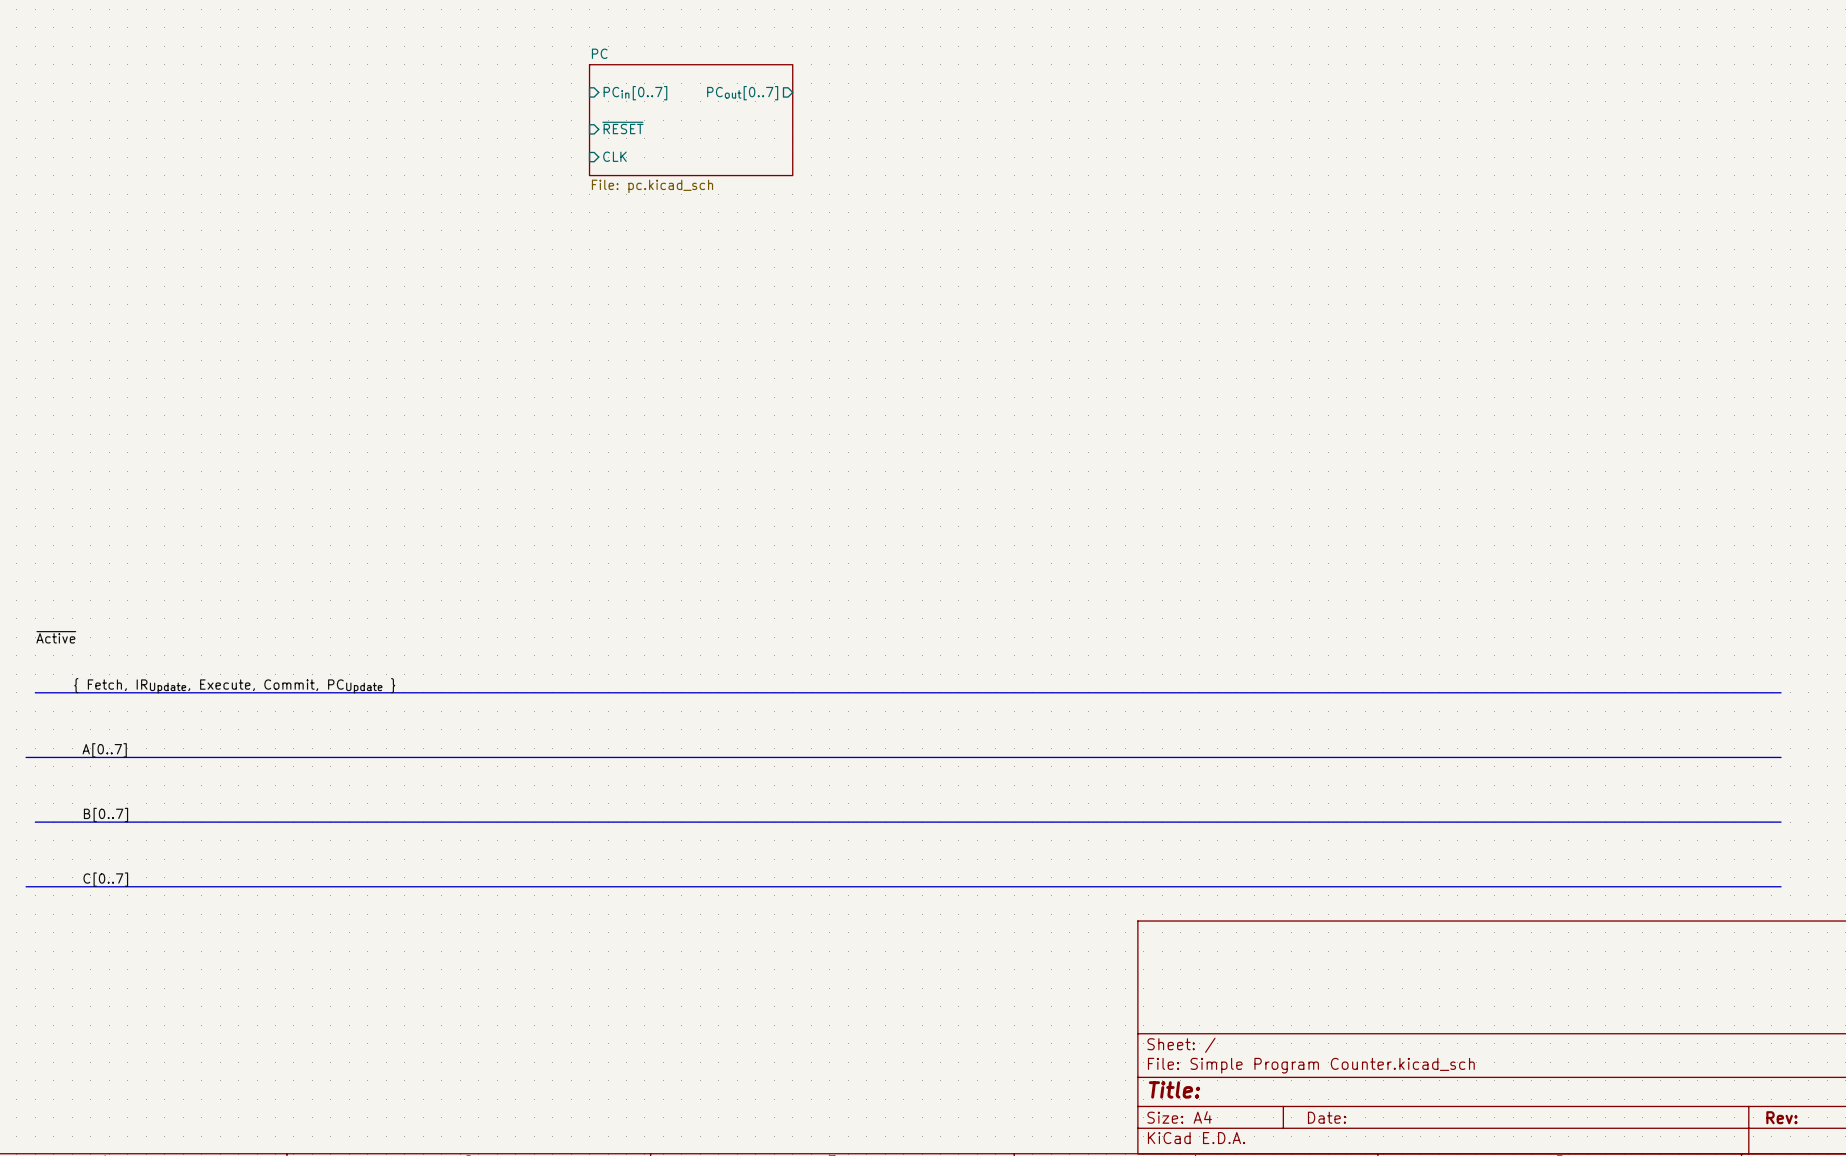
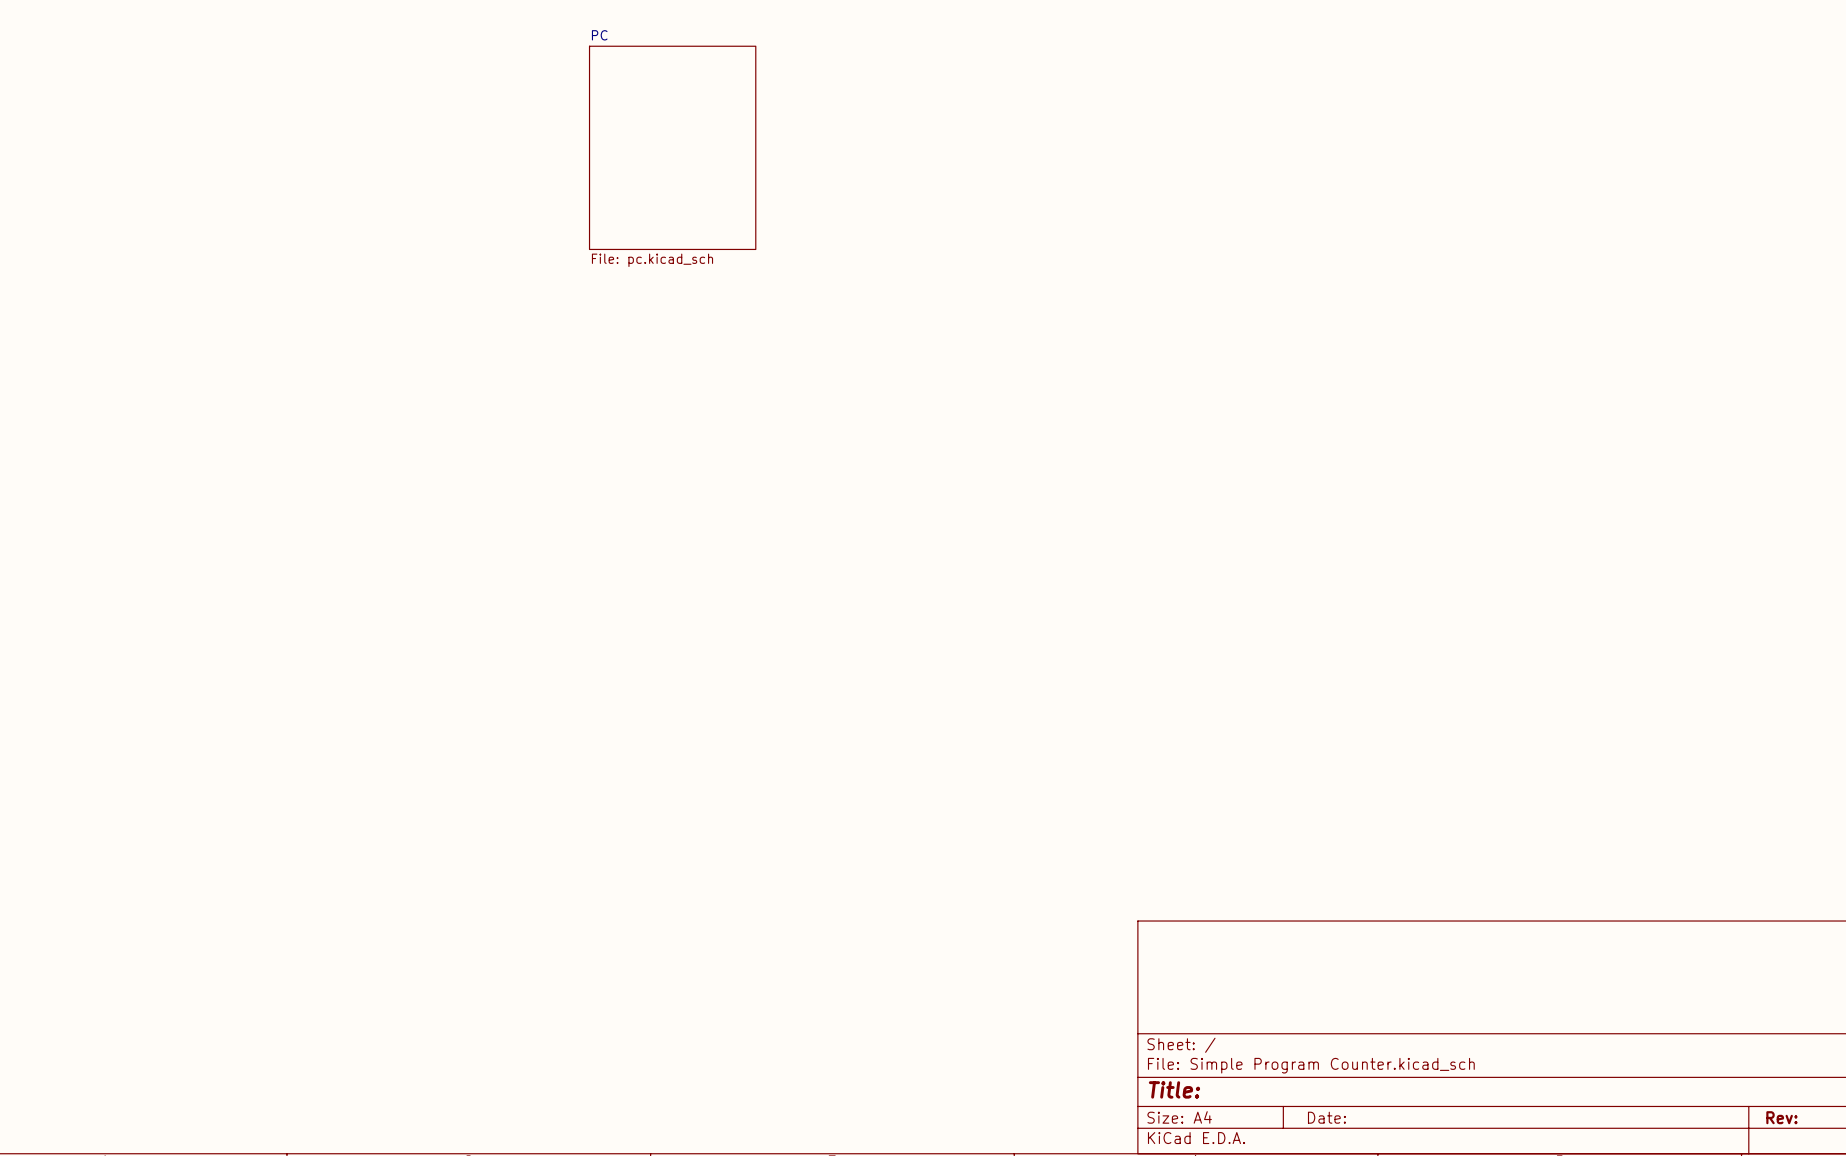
sheet pin: PCin[0..7] (635, 93) -> none
sheet pin: PCout[0..7] (742, 93) -> none
sheet PC: File: pc.kicad_sch (691, 120) -> none
sheet pin: ~{RESET} (622, 127) -> none
sheet PC: none -> File: pc.kicad_sch (672, 147)
sheet pin: CLK (614, 156) -> none
label: ~{Active} (56, 637) -> none
label: { Fetch, IRUpdate, Execute, Commit, PCUpdate } (234, 685) -> none
bus: (35, 692) (1781, 692) -> none
label: A[0..7] (104, 750) -> none
bus: (26, 757) (1781, 757) -> none
label: B[0..7] (106, 814) -> none
bus: (35, 822) (1781, 822) -> none
label: C[0..7] (105, 879) -> none
bus: (26, 886) (1781, 886) -> none

